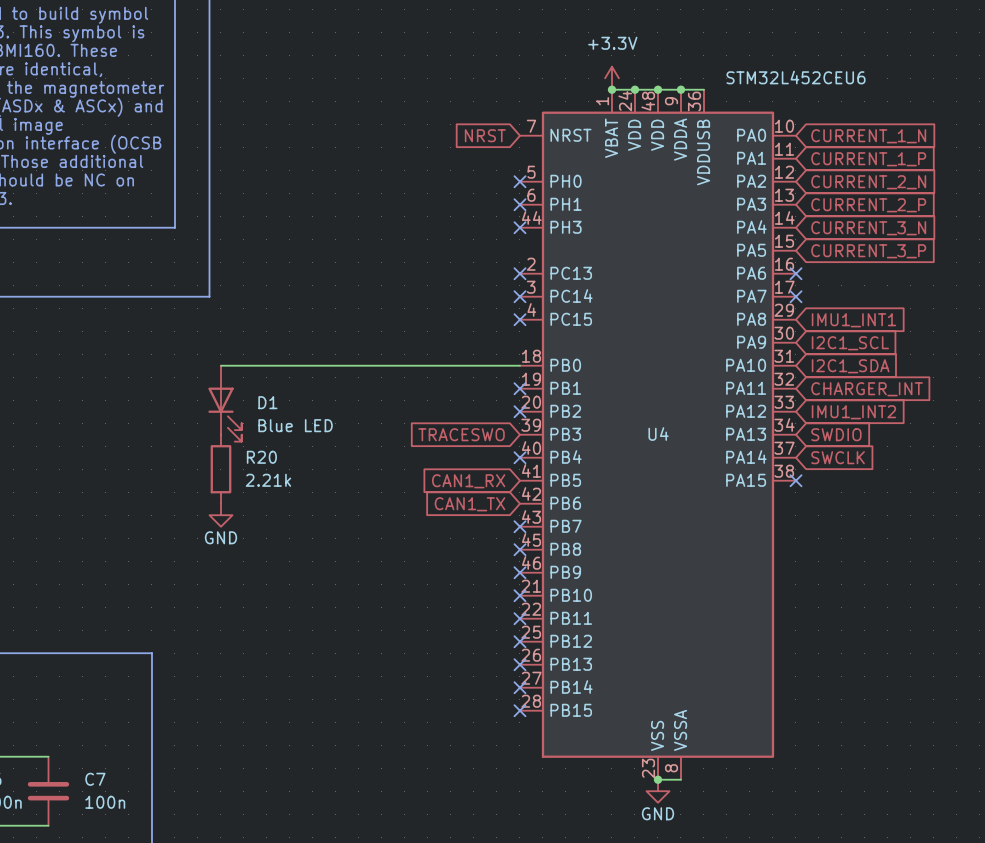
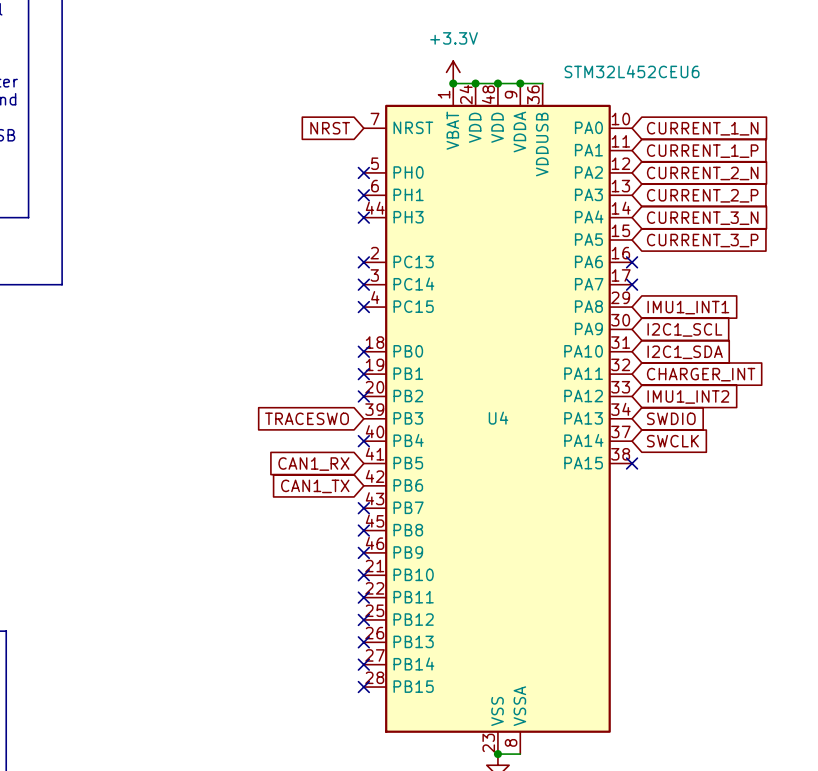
wire: (220, 365) (519, 365) -> none
no-connect mark: none -> (363, 351)
D1: Blue LED (225, 403) -> none
R20: 2.21k (220, 469) -> none
power symbol: GND (220, 515) -> none

